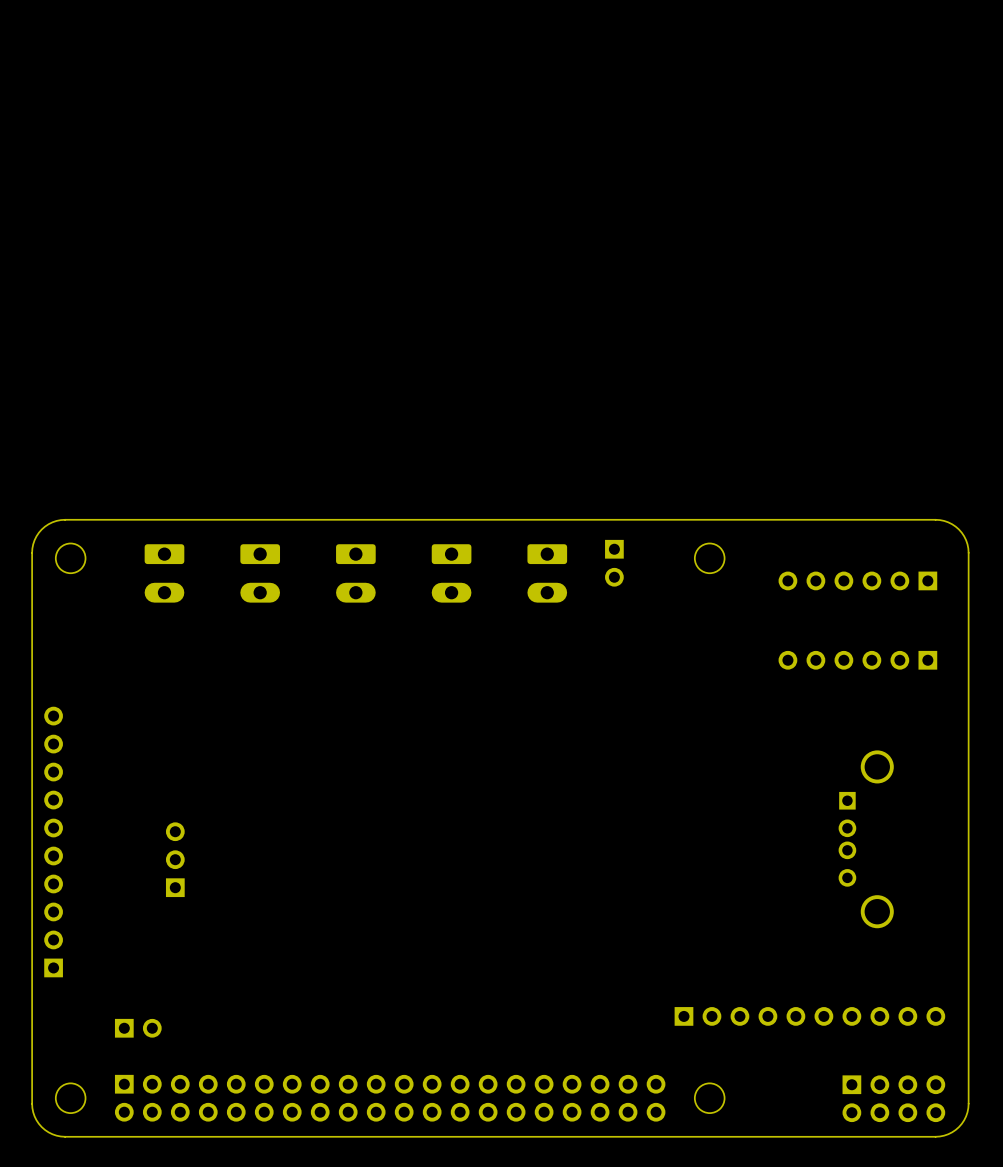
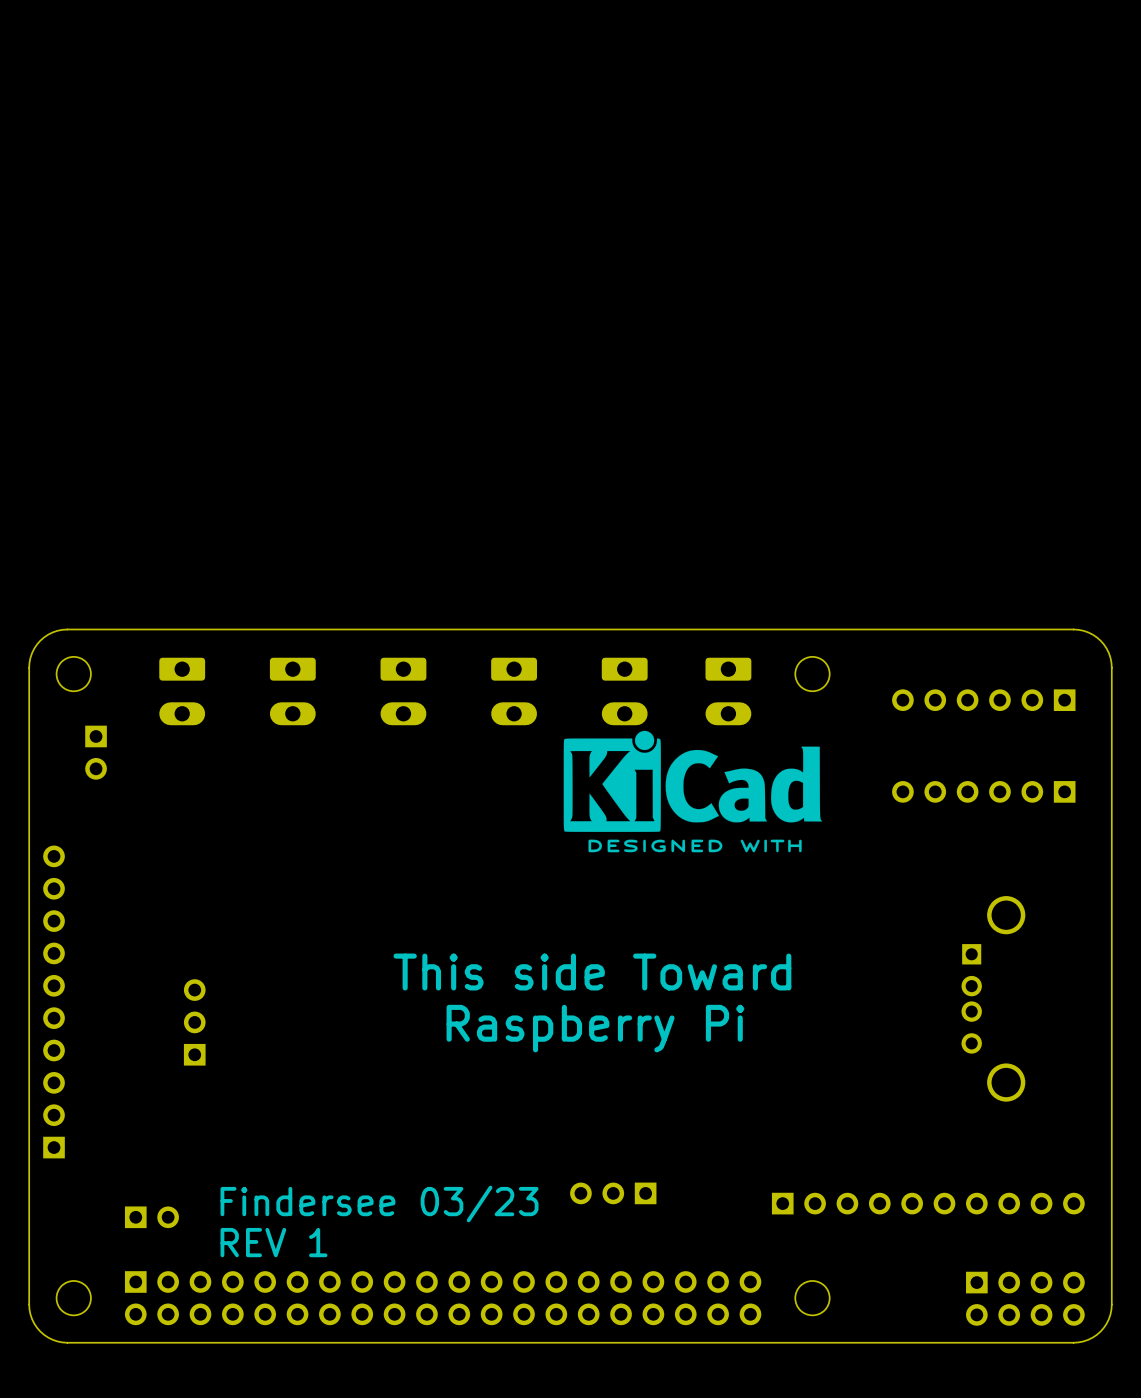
part: (614, 563) -> none
part: none -> (728, 691)
drawing: none -> [563, 730, 823, 853]
part: none -> (96, 752)
text: none -> This side Toward (592, 972)
text: none -> Raspberry Pi (595, 1028)
part: none -> (613, 1193)
text: none -> Findersee 03/23 (379, 1203)
text: none -> REV 1 (273, 1242)

